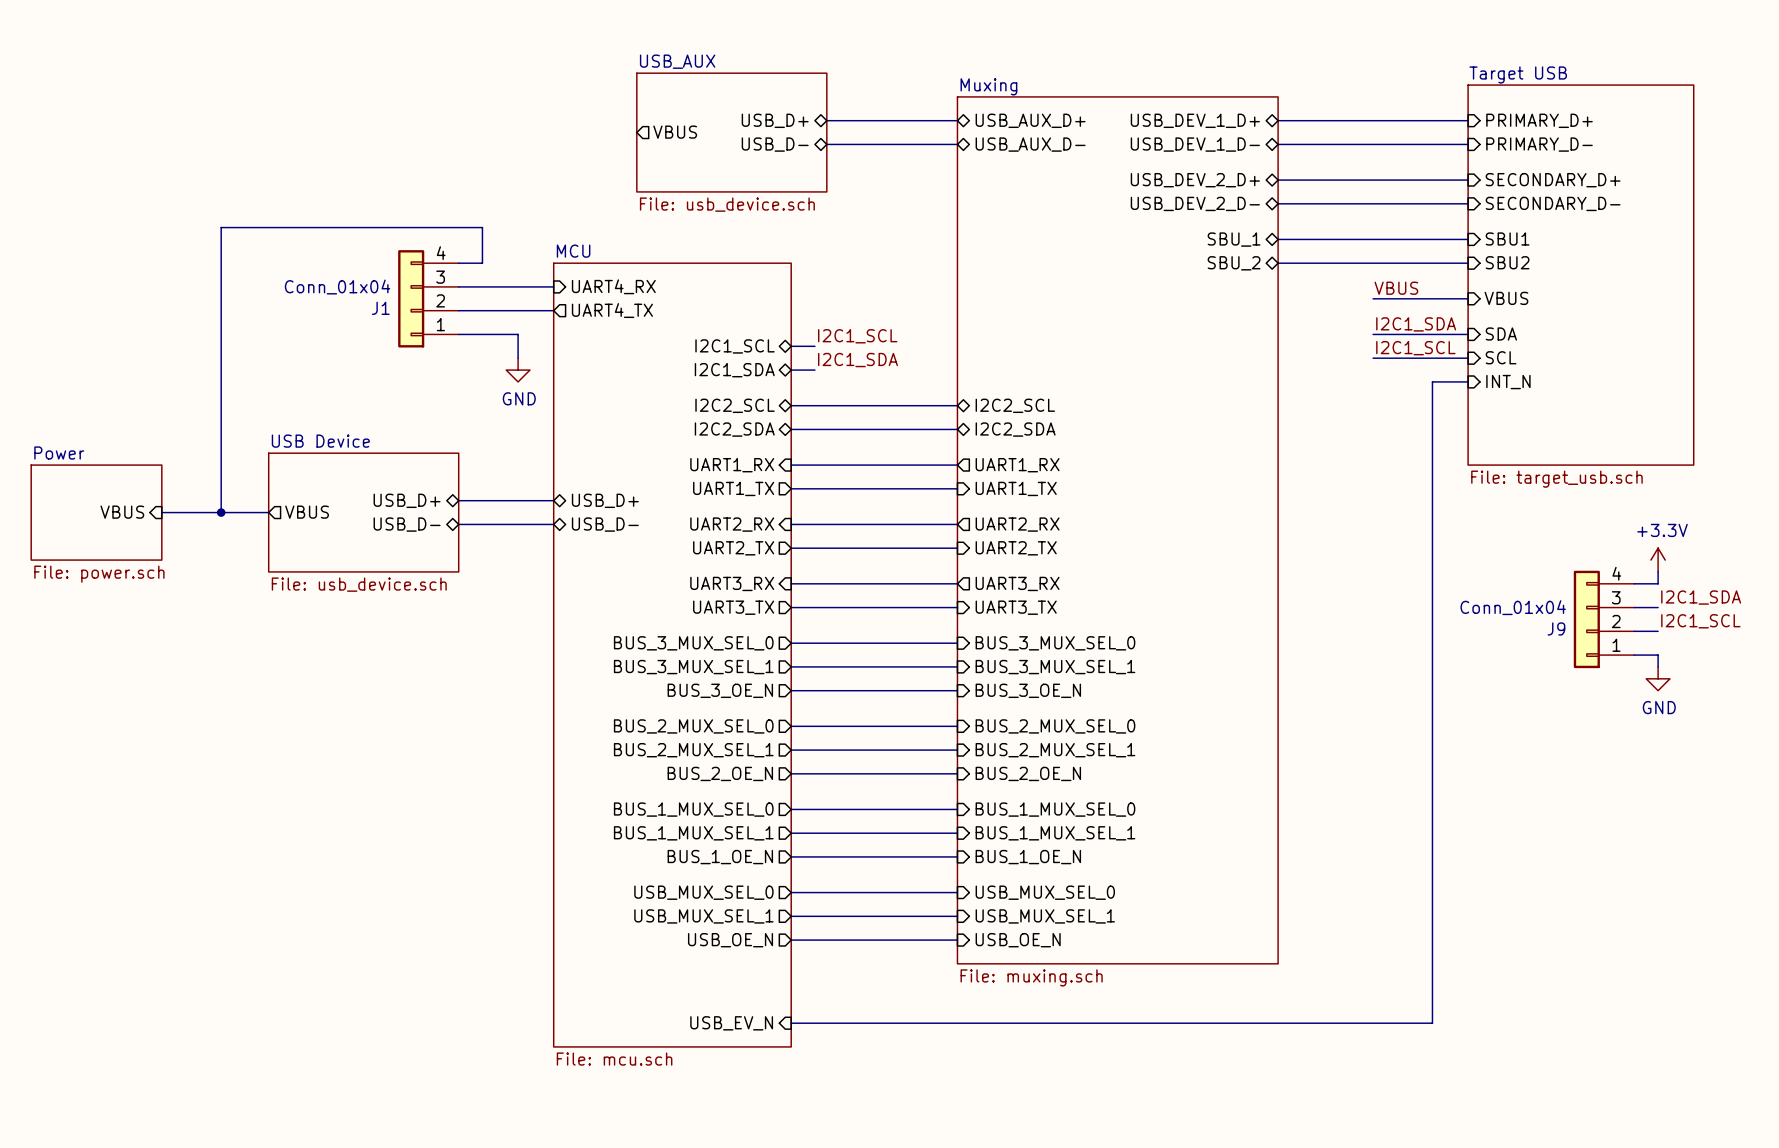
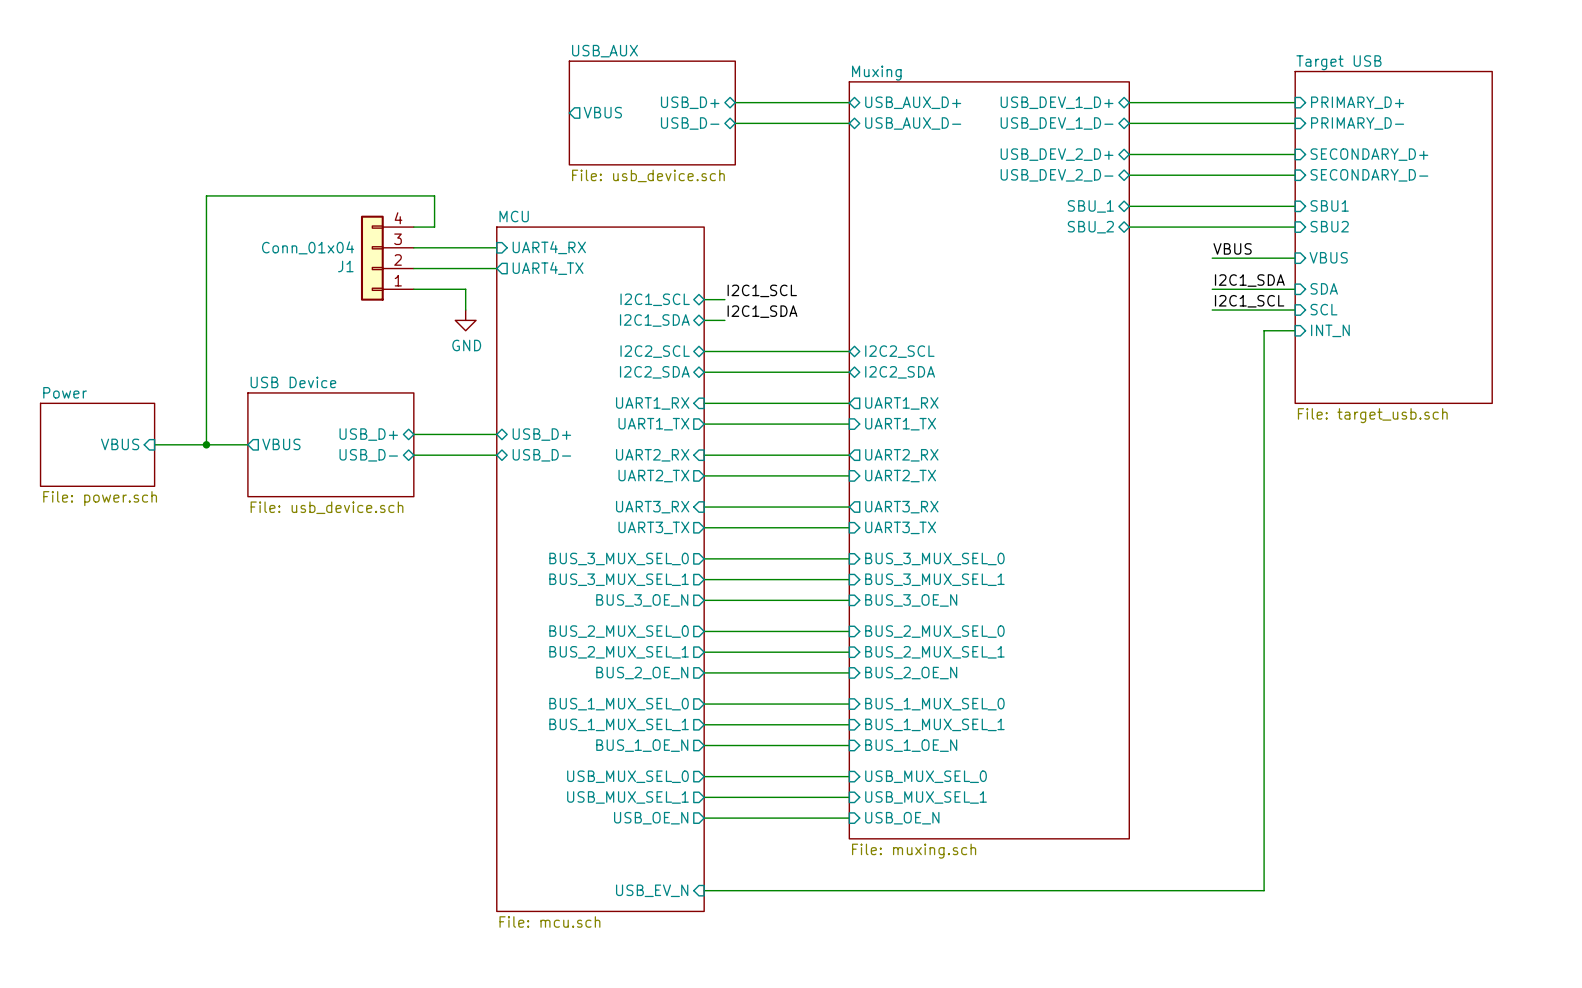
power symbol: +3.3V (1658, 560) -> none
wire: (1658, 571) (1658, 583) (1634, 583) -> none
label: I2C1_SDA (1701, 597) -> none
wire: (1634, 607) (1658, 607) -> none
J9: Conn_01x04 (1604, 619) -> none
label: I2C1_SCL (1700, 621) -> none
wire: (1634, 631) (1658, 631) -> none
wire: (1634, 655) (1658, 655) (1658, 666) -> none
power symbol: GND (1658, 678) -> none

